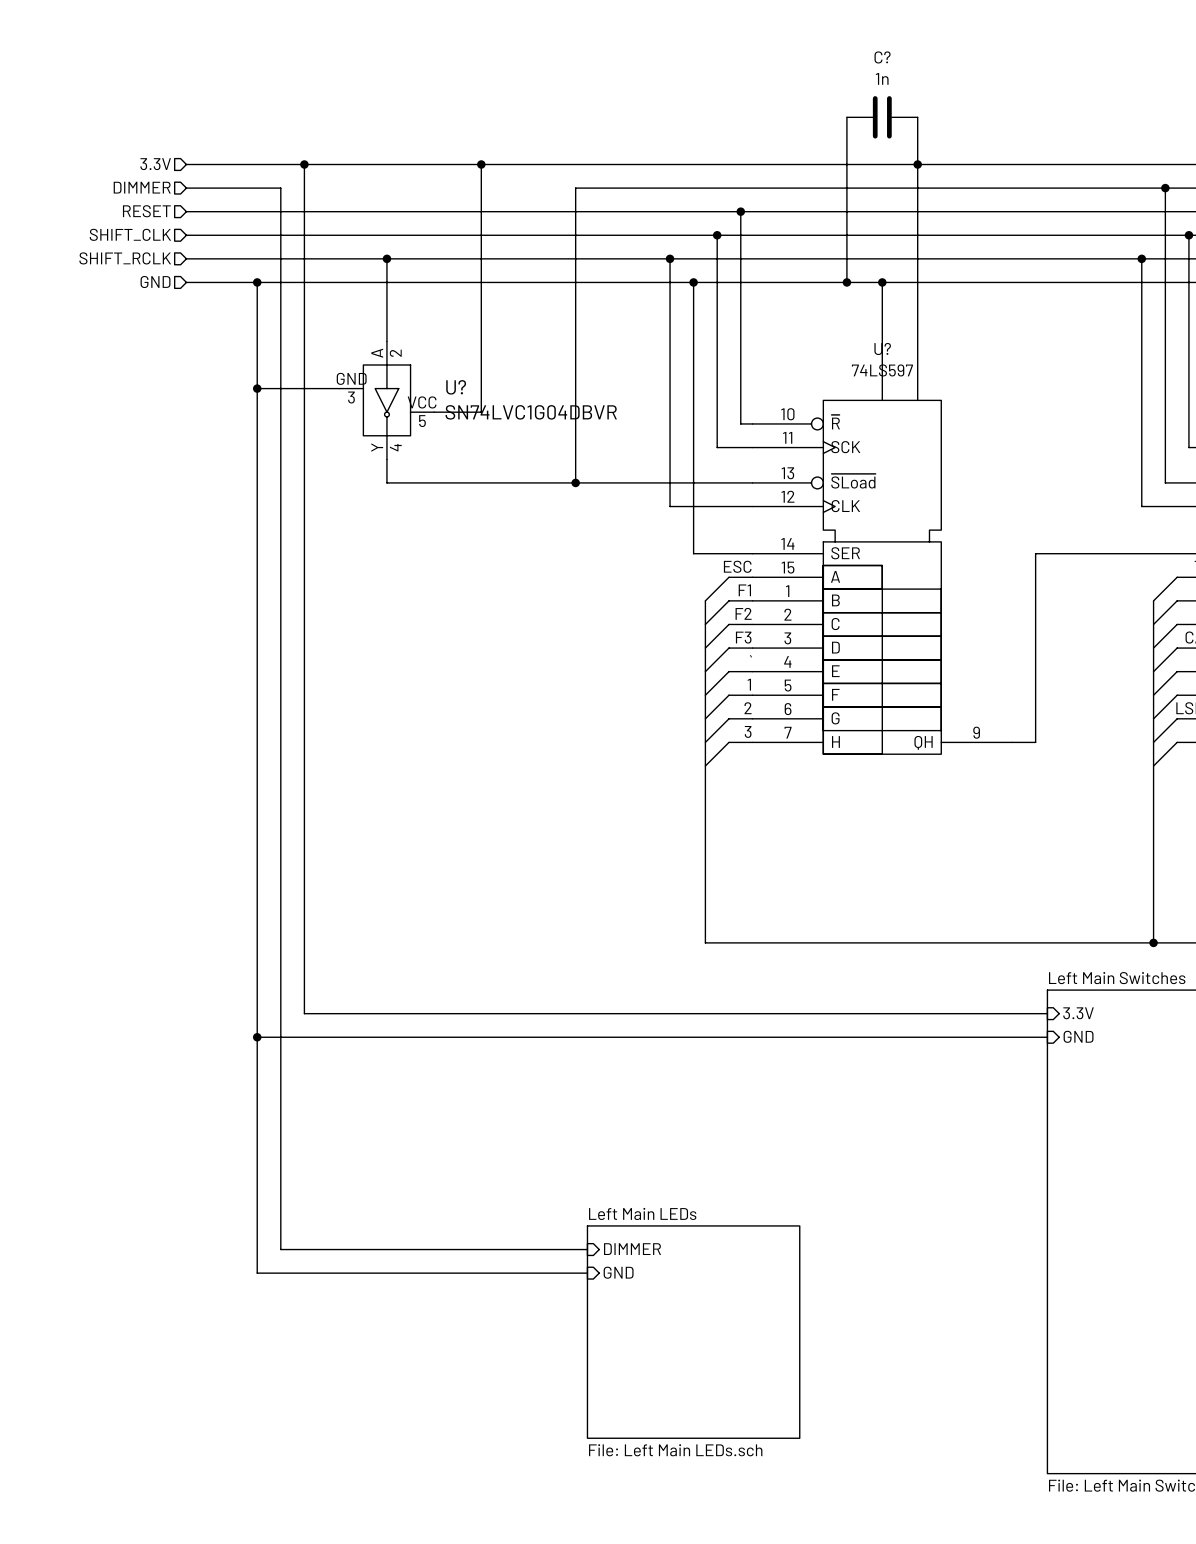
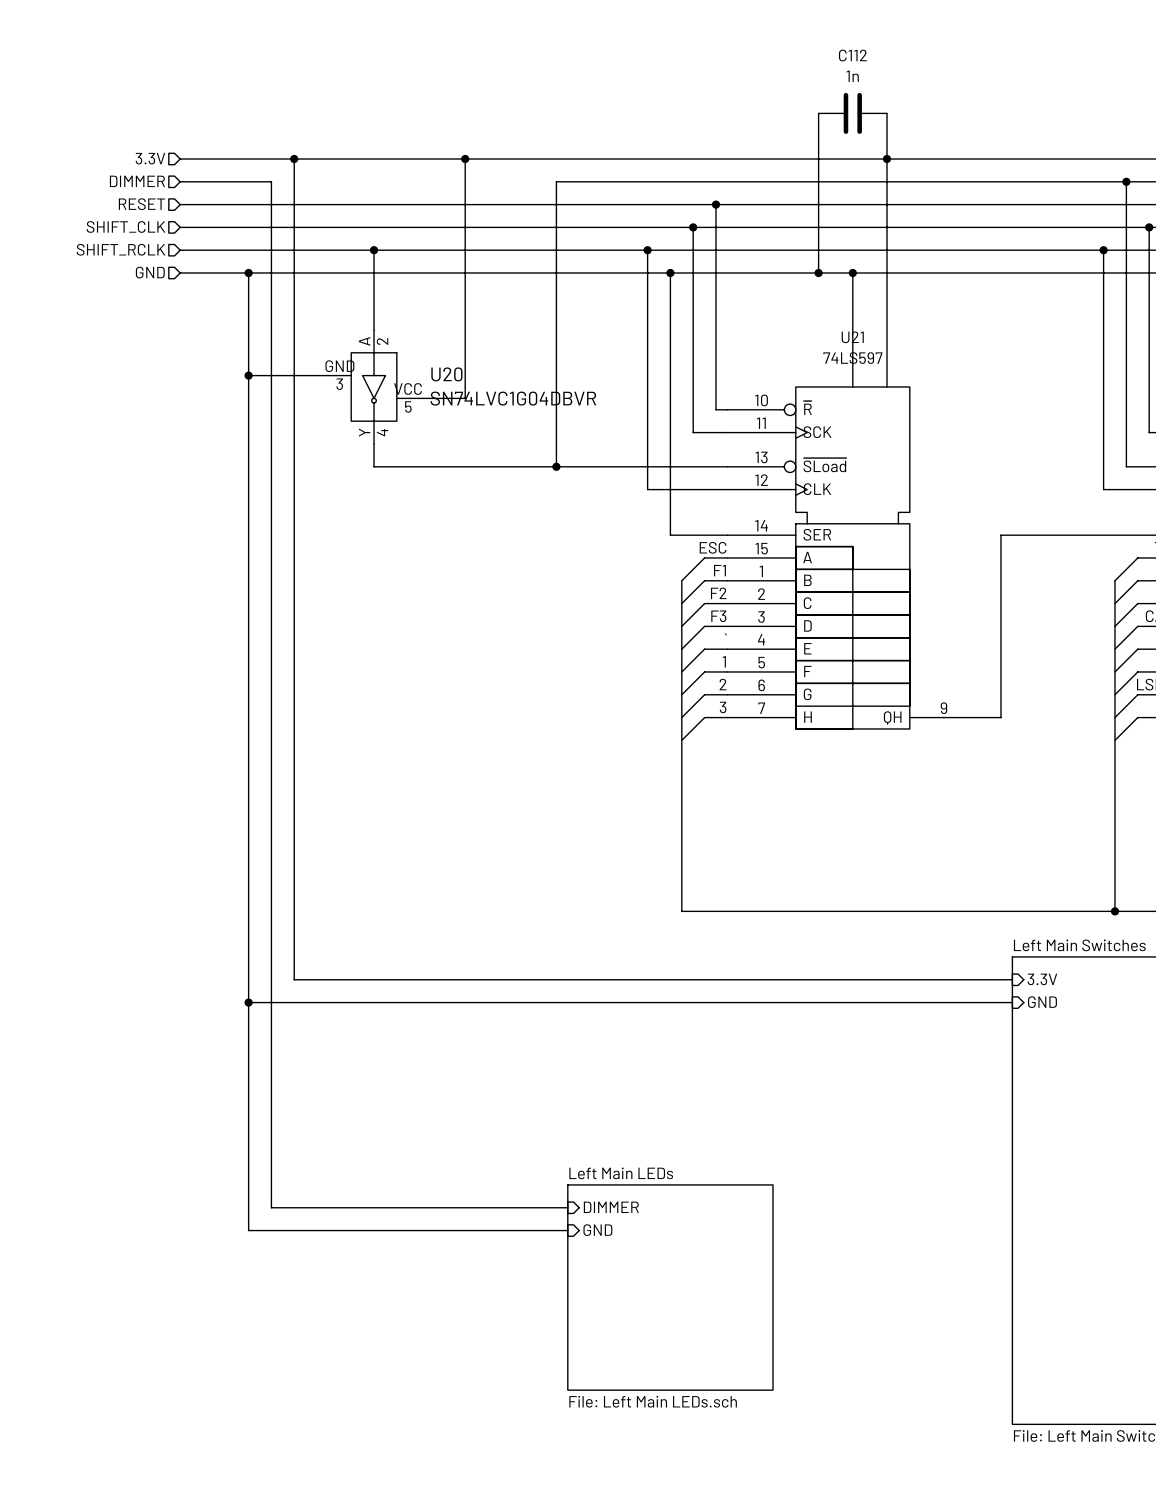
C? name: C? (882, 57) -> C112 (852, 55)
U? name: U? (882, 348) -> U21 (852, 337)
U? name: U? (456, 387) -> U20 (446, 374)

